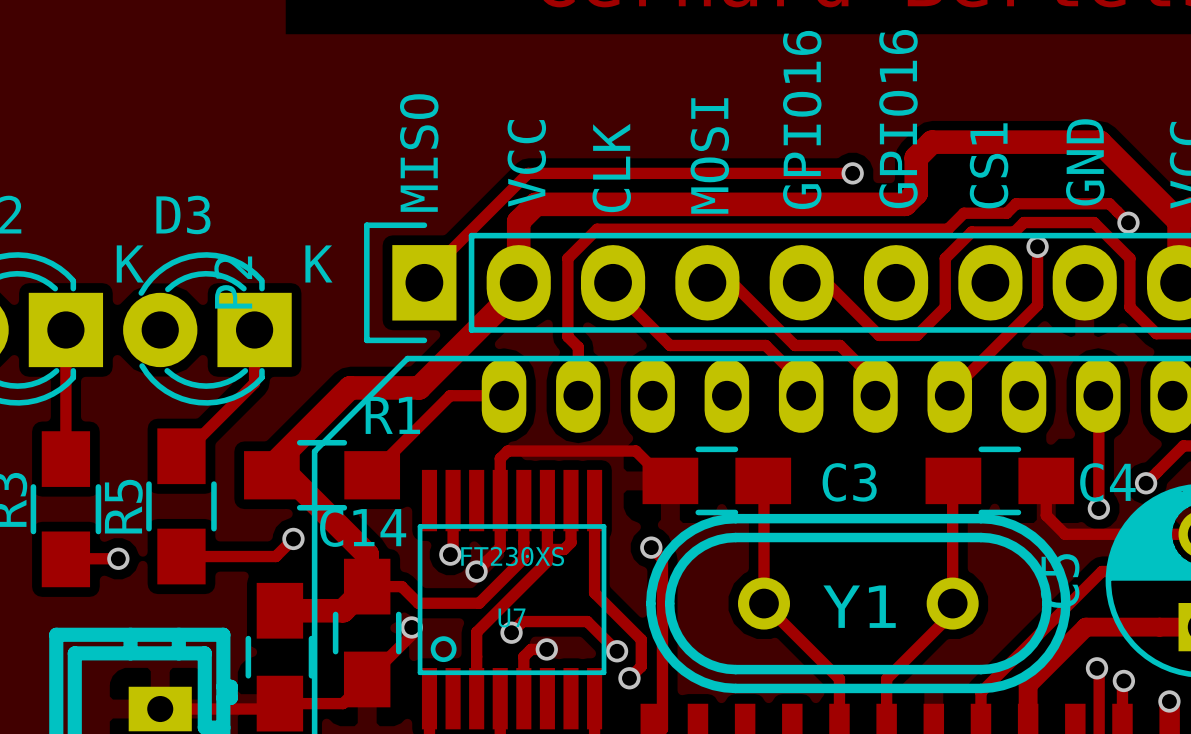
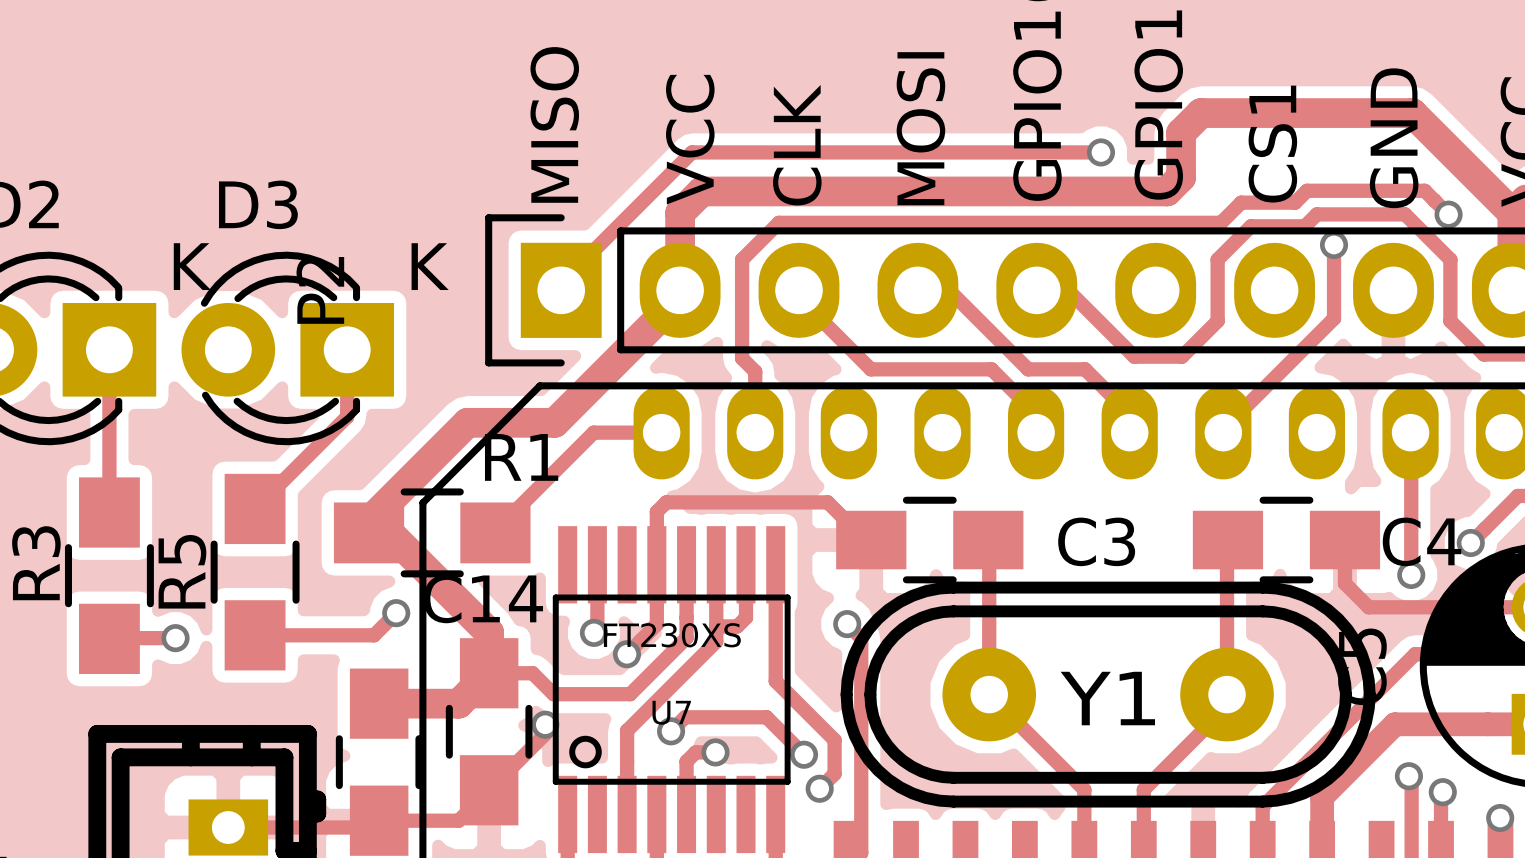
Y1 footprint: [646, 513, 1071, 694] -> [840, 581, 1376, 808]

